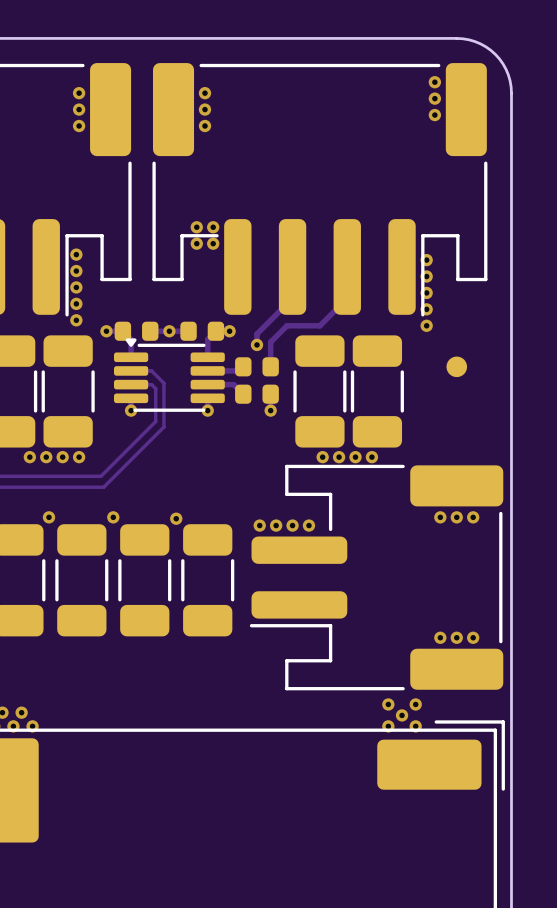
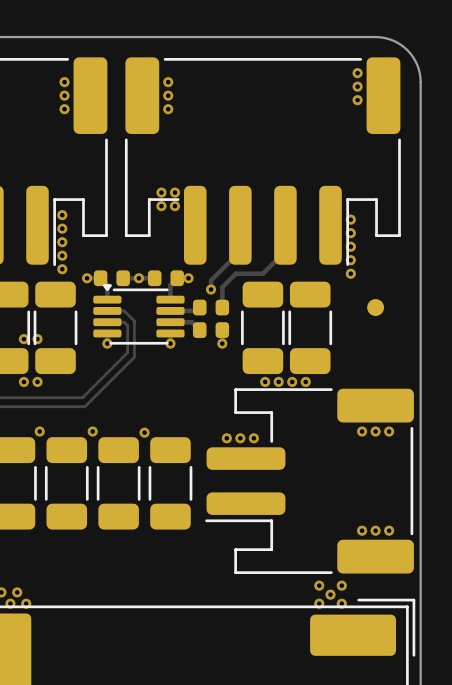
via: none -> (23, 339)
via: none -> (37, 339)
via: (62, 457) -> none
via: (79, 457) -> none
via: (259, 525) -> none

